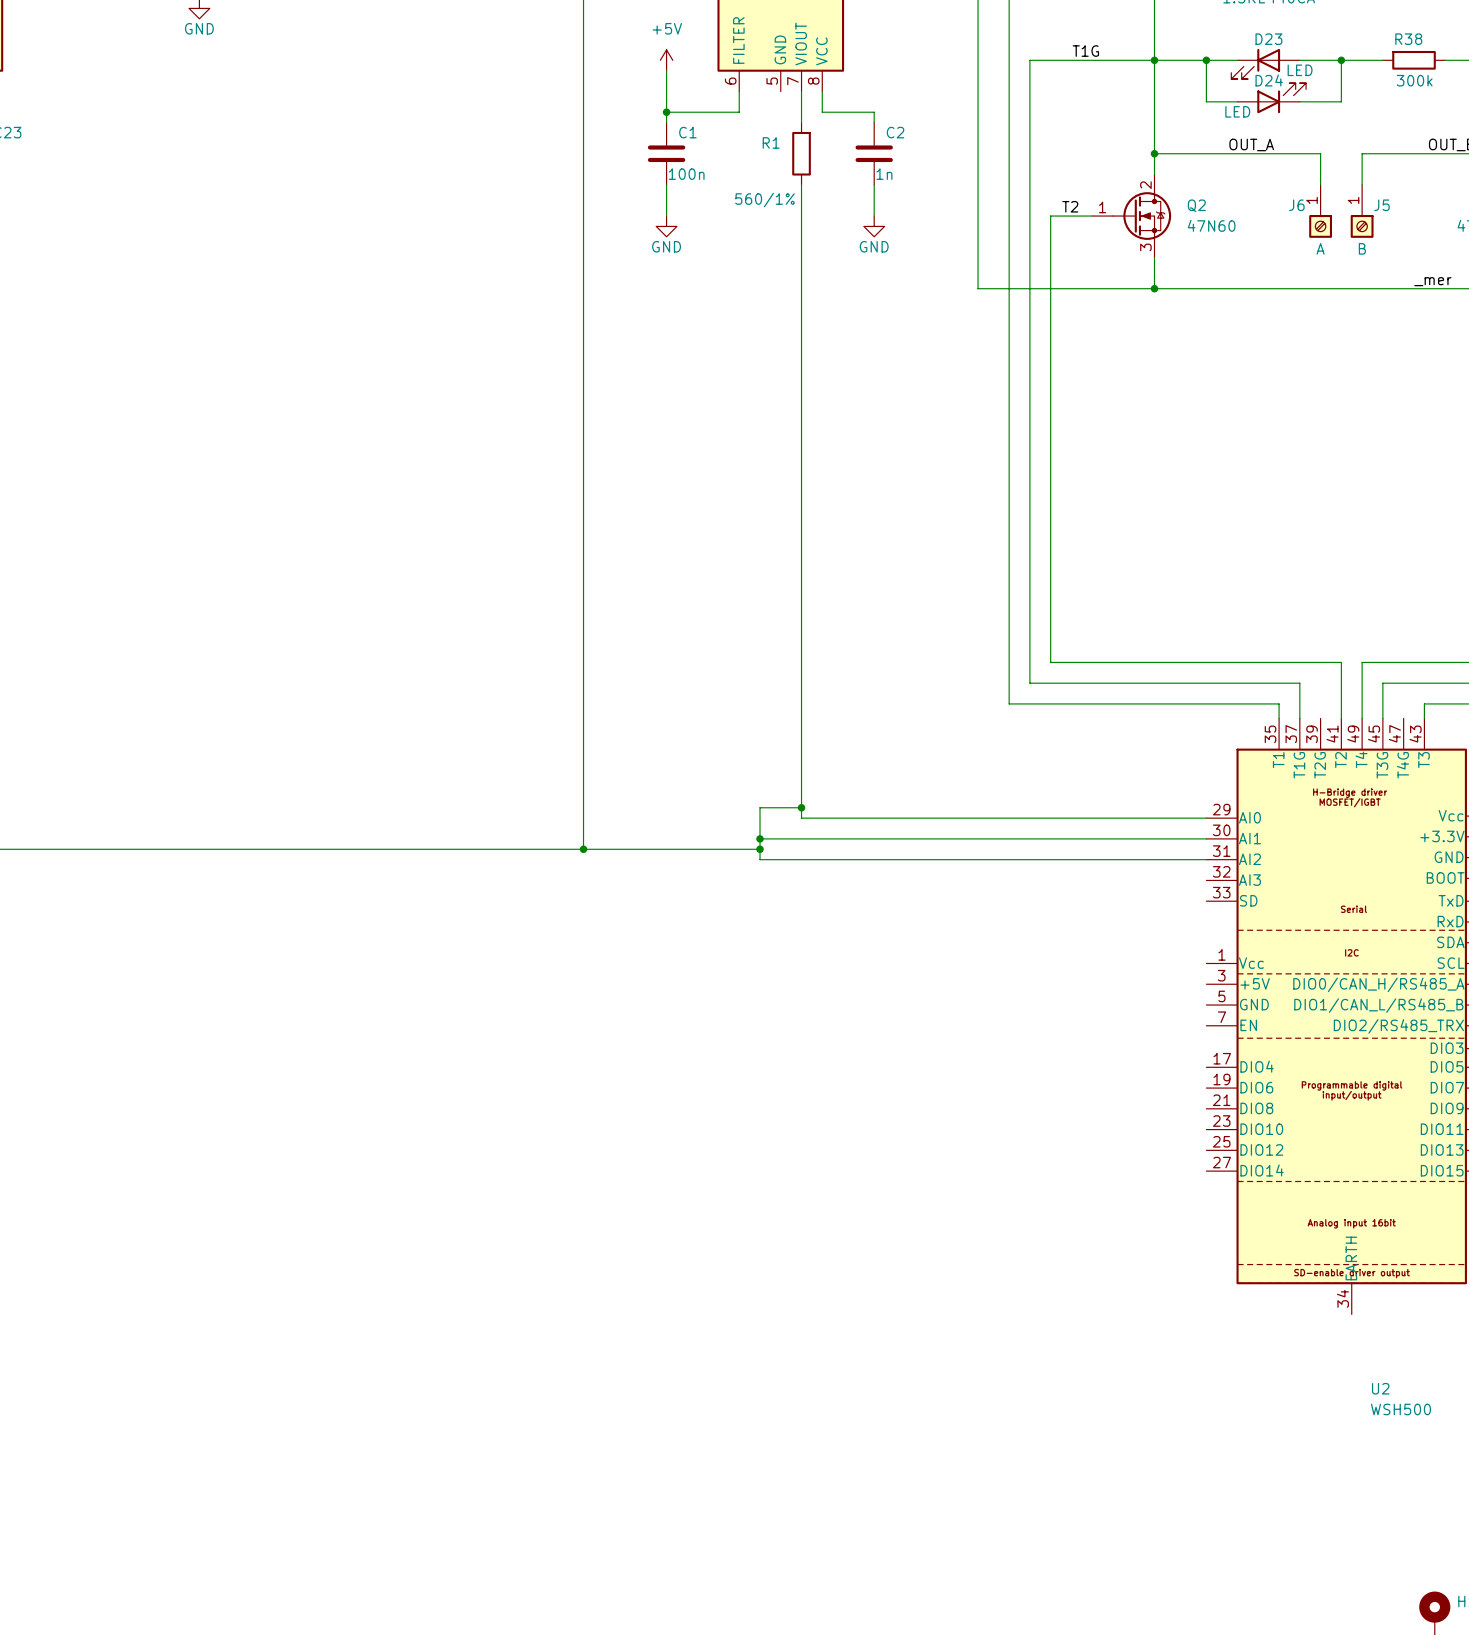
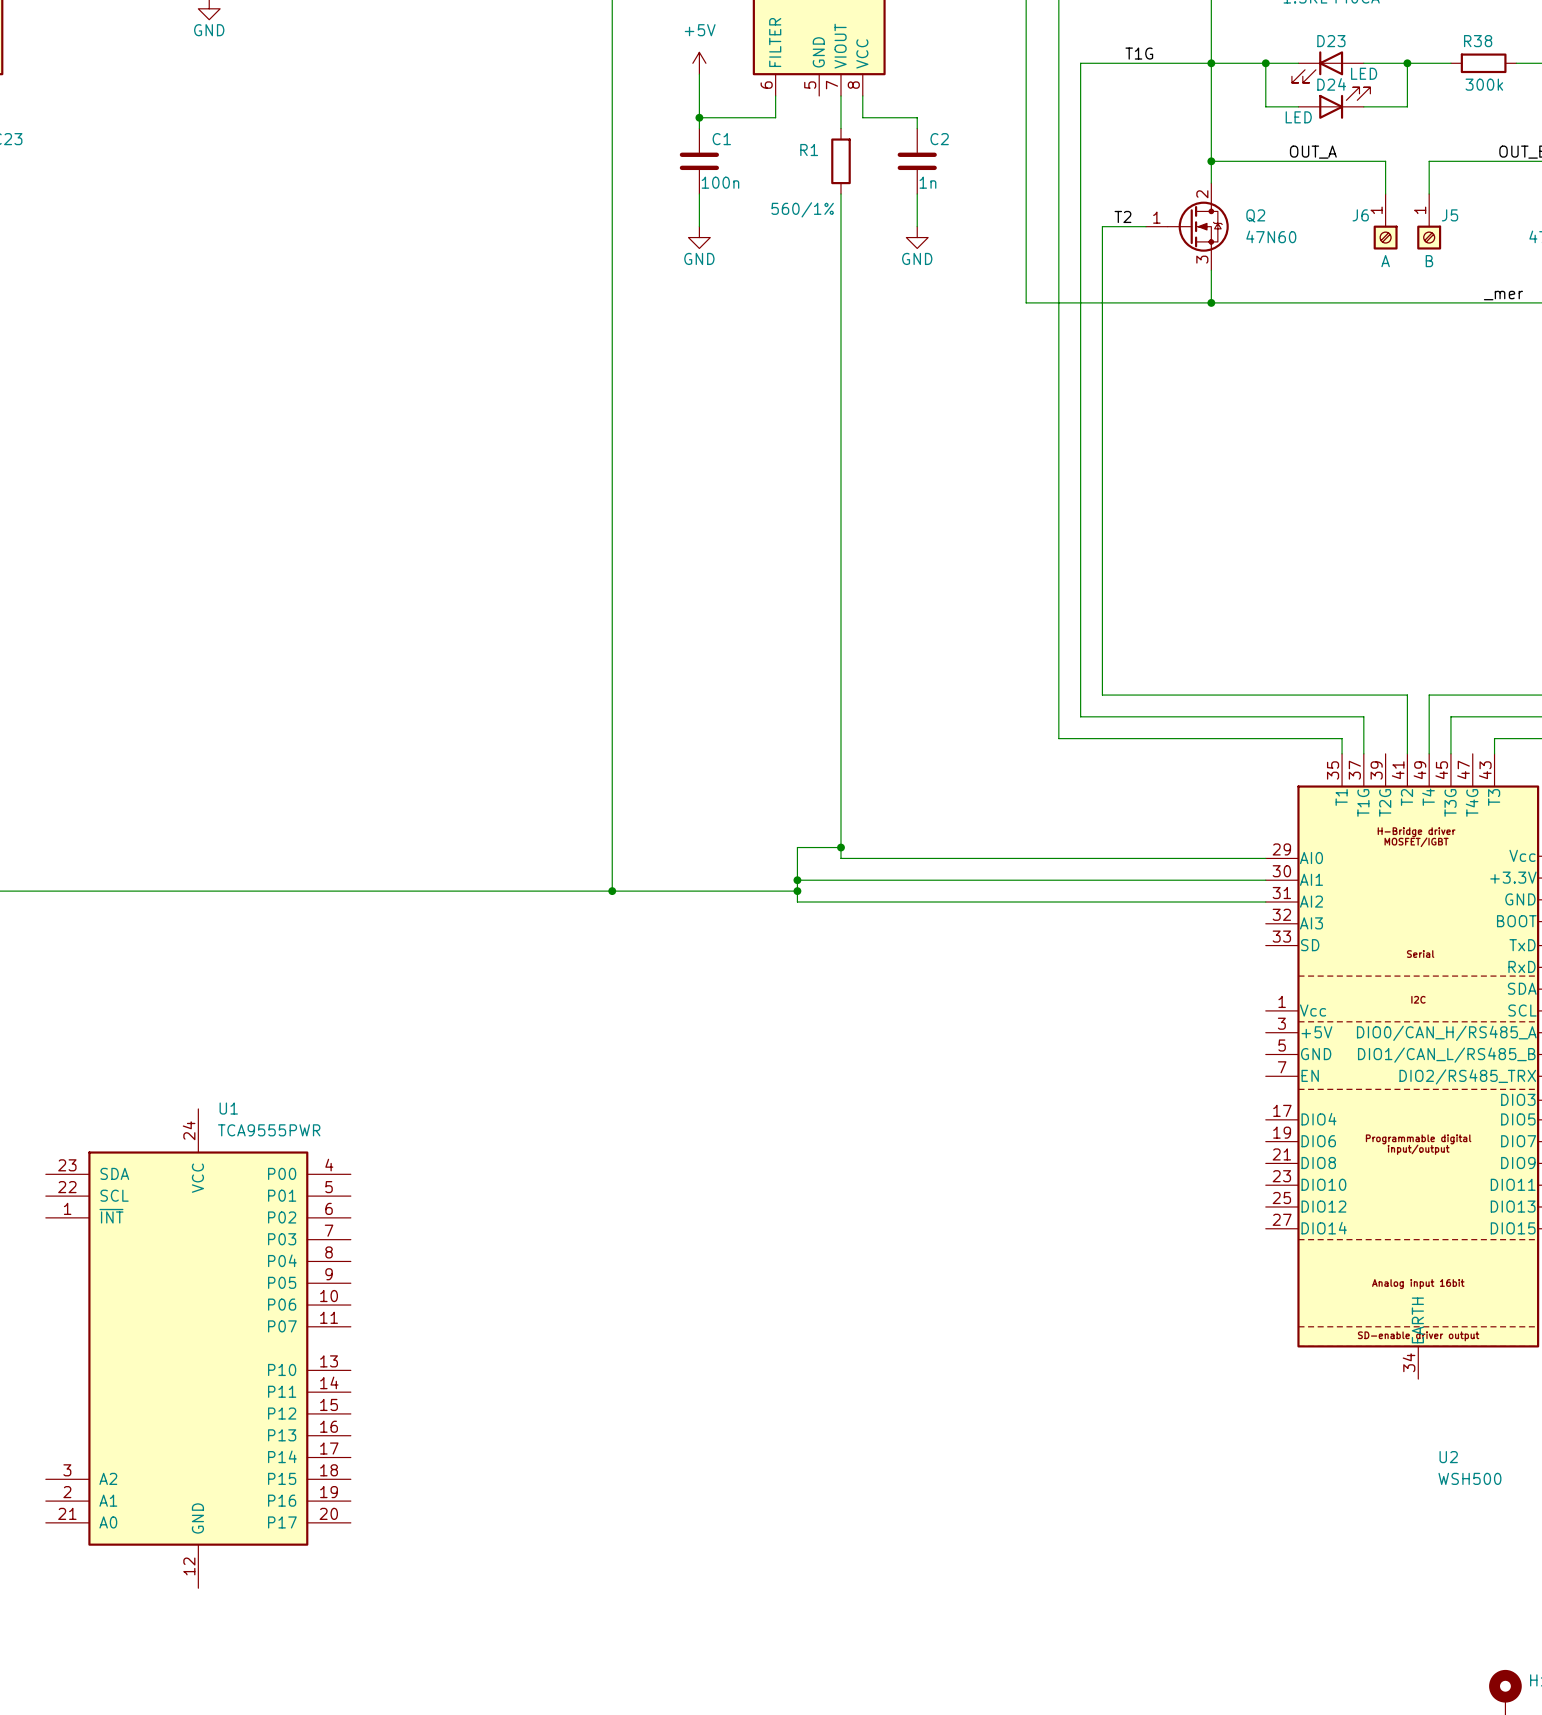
U1: none -> TCA9555PWR (198, 1348)

